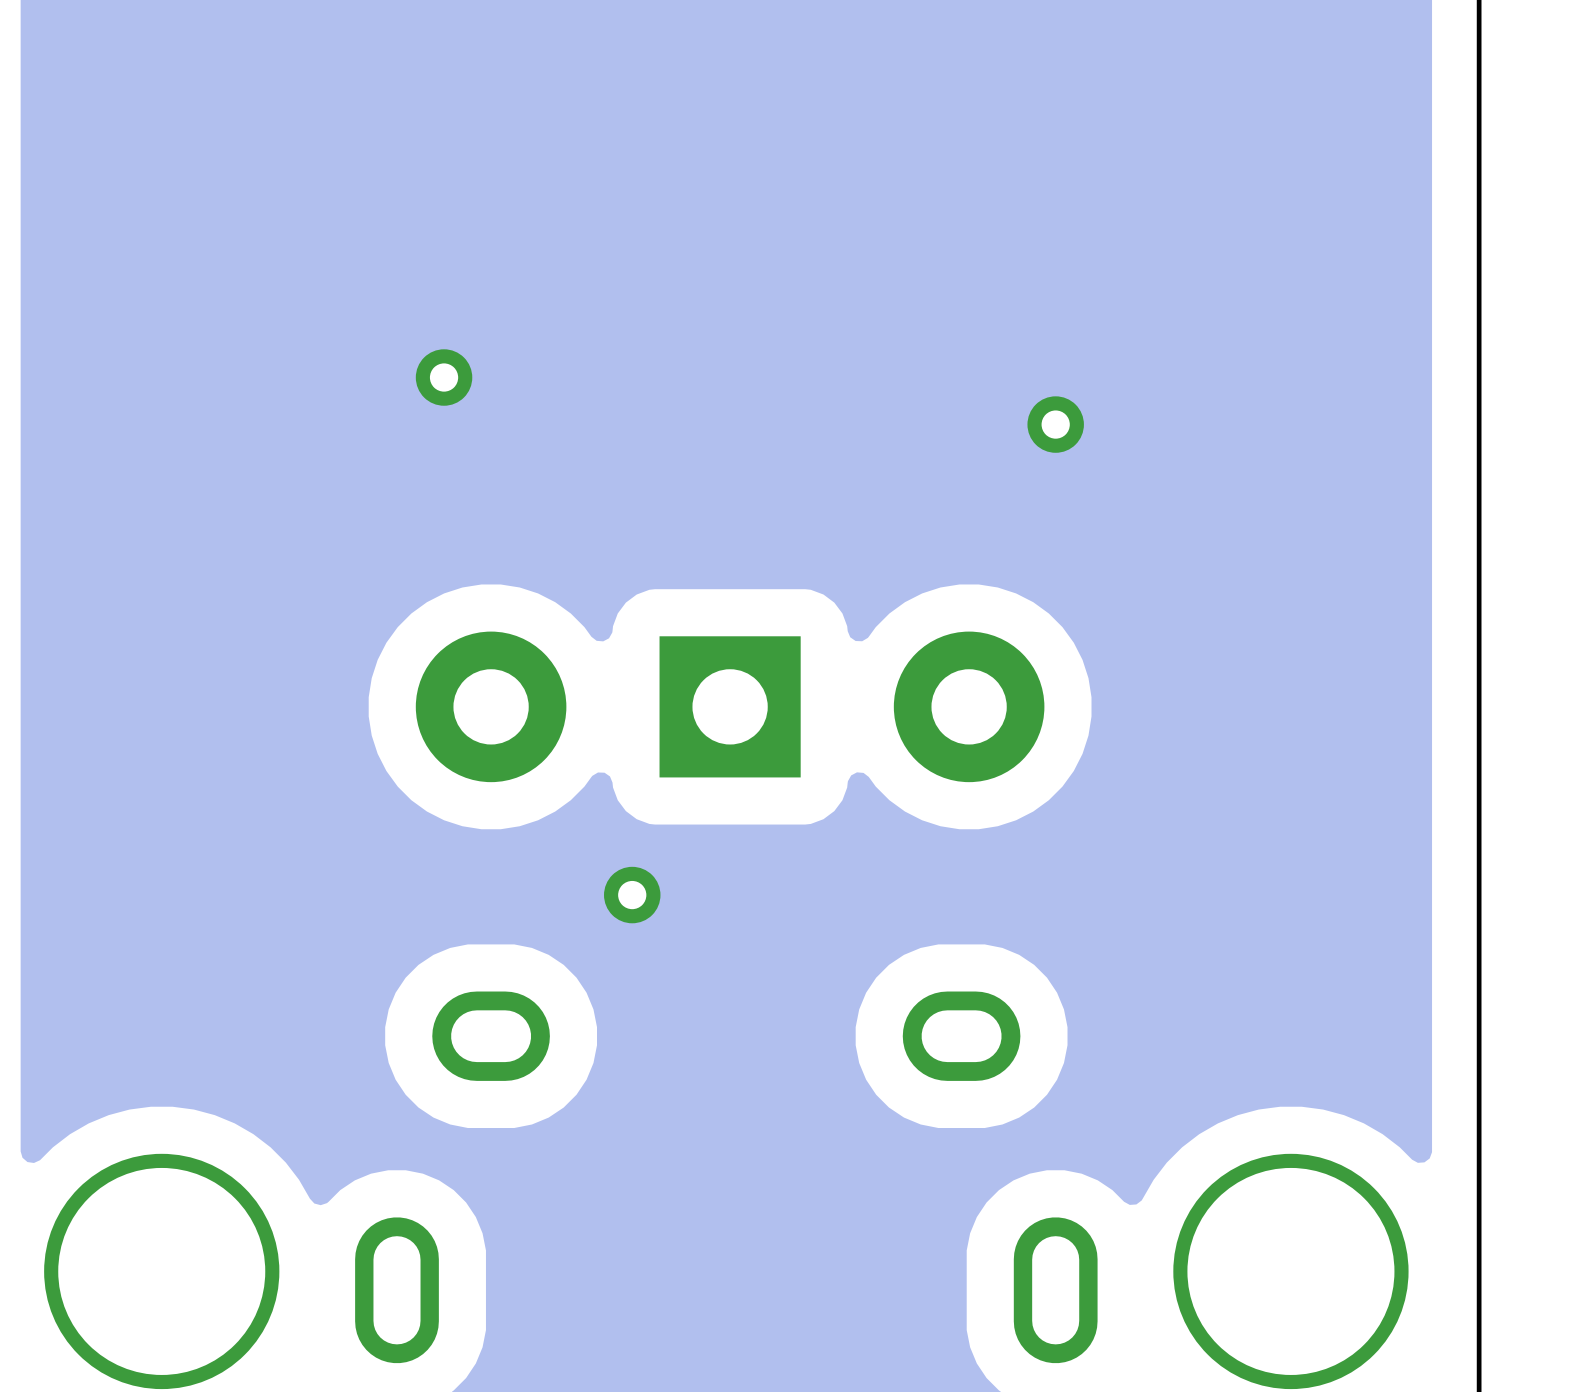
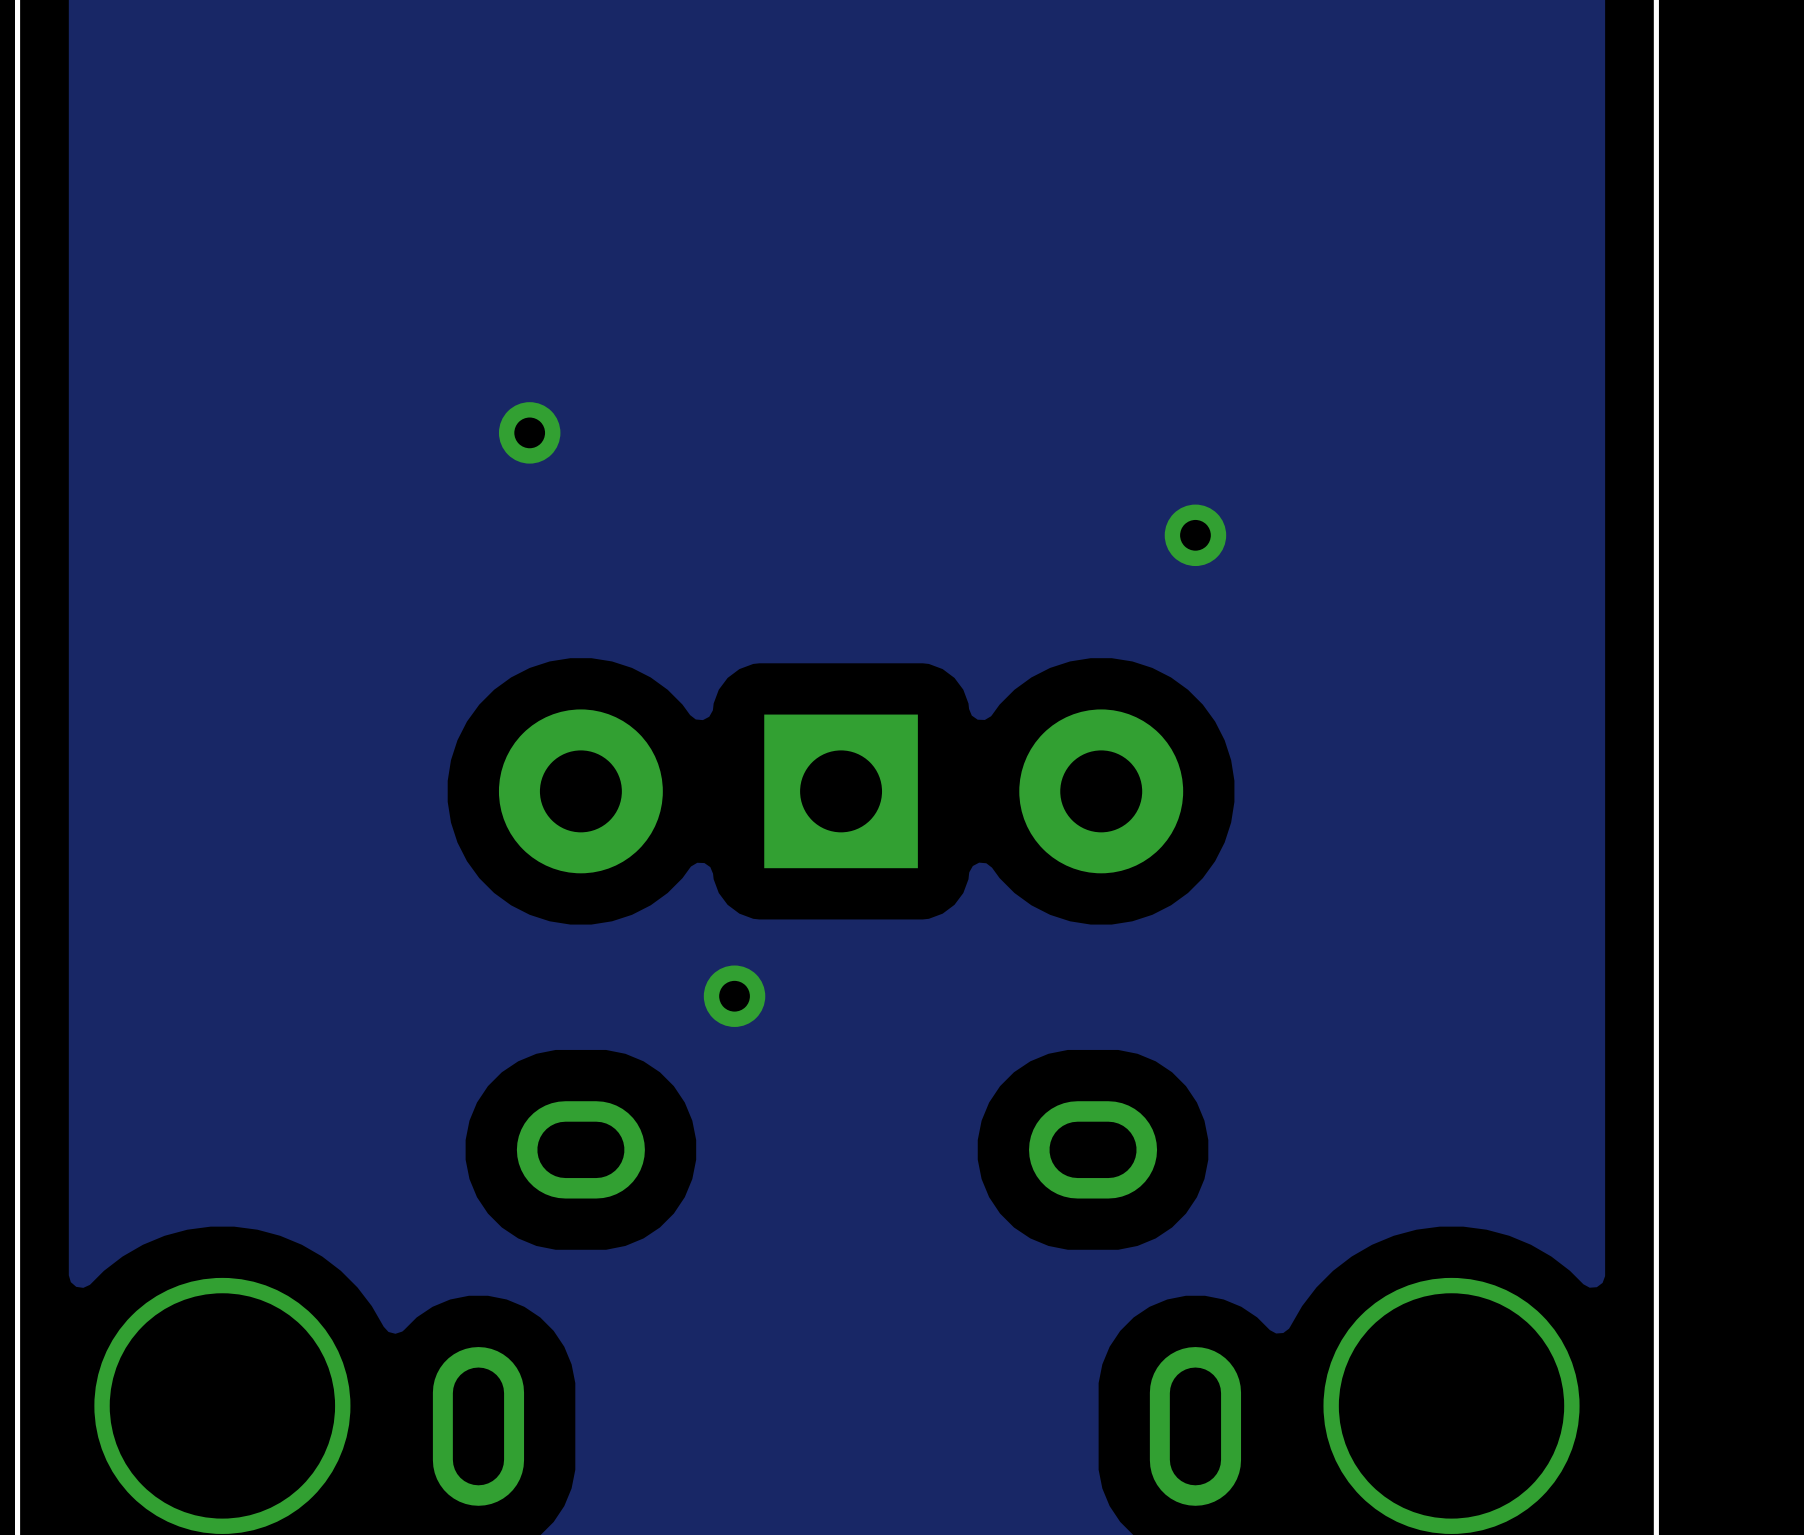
via position: (1055, 424) -> (1195, 535)

